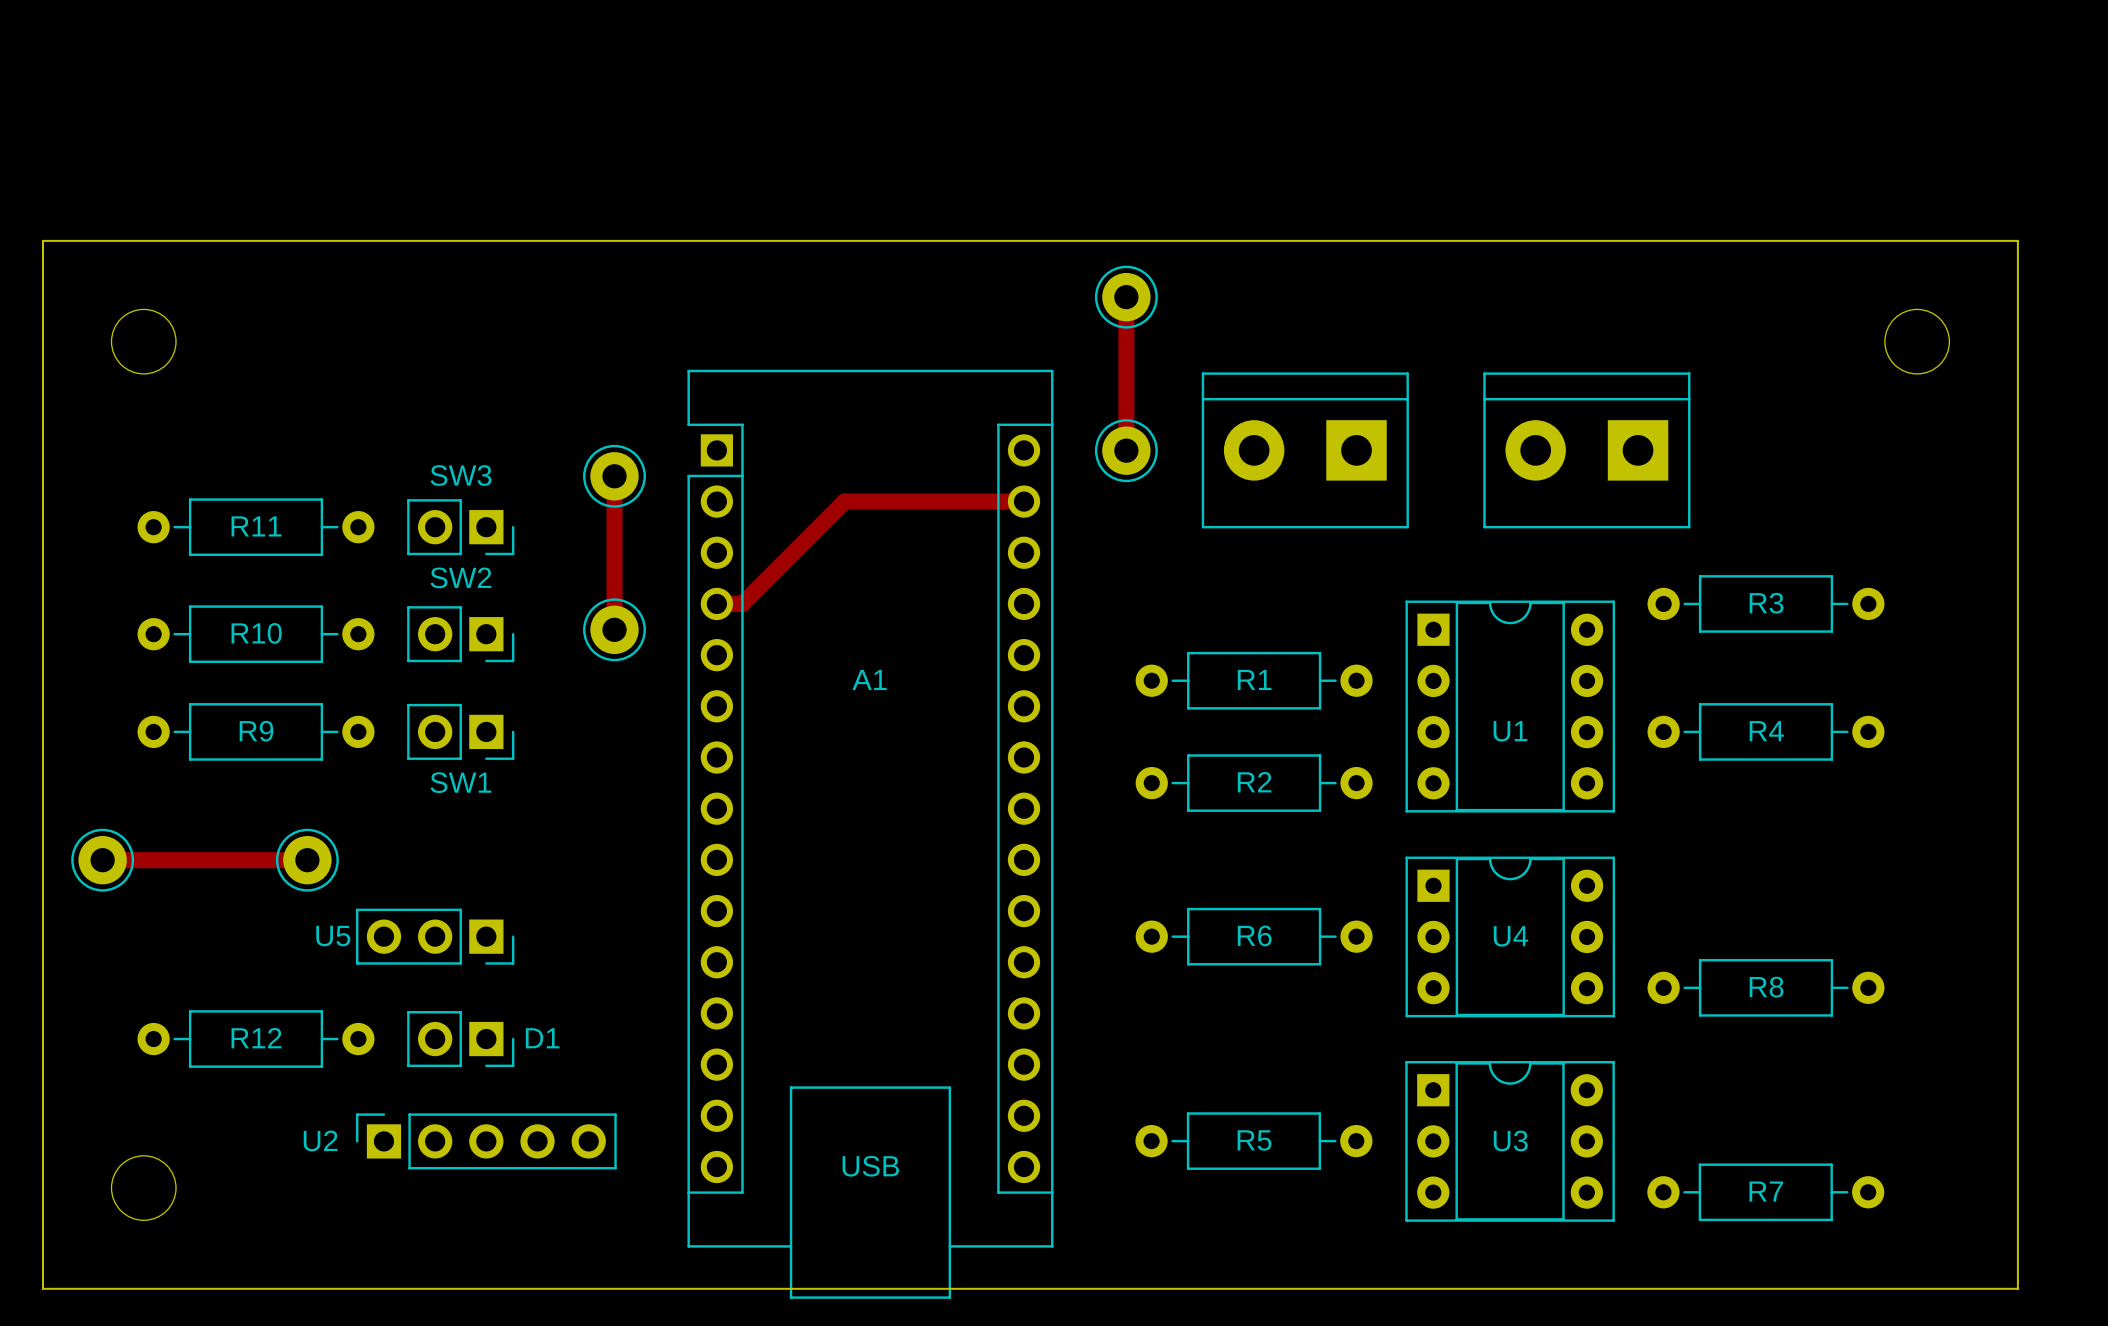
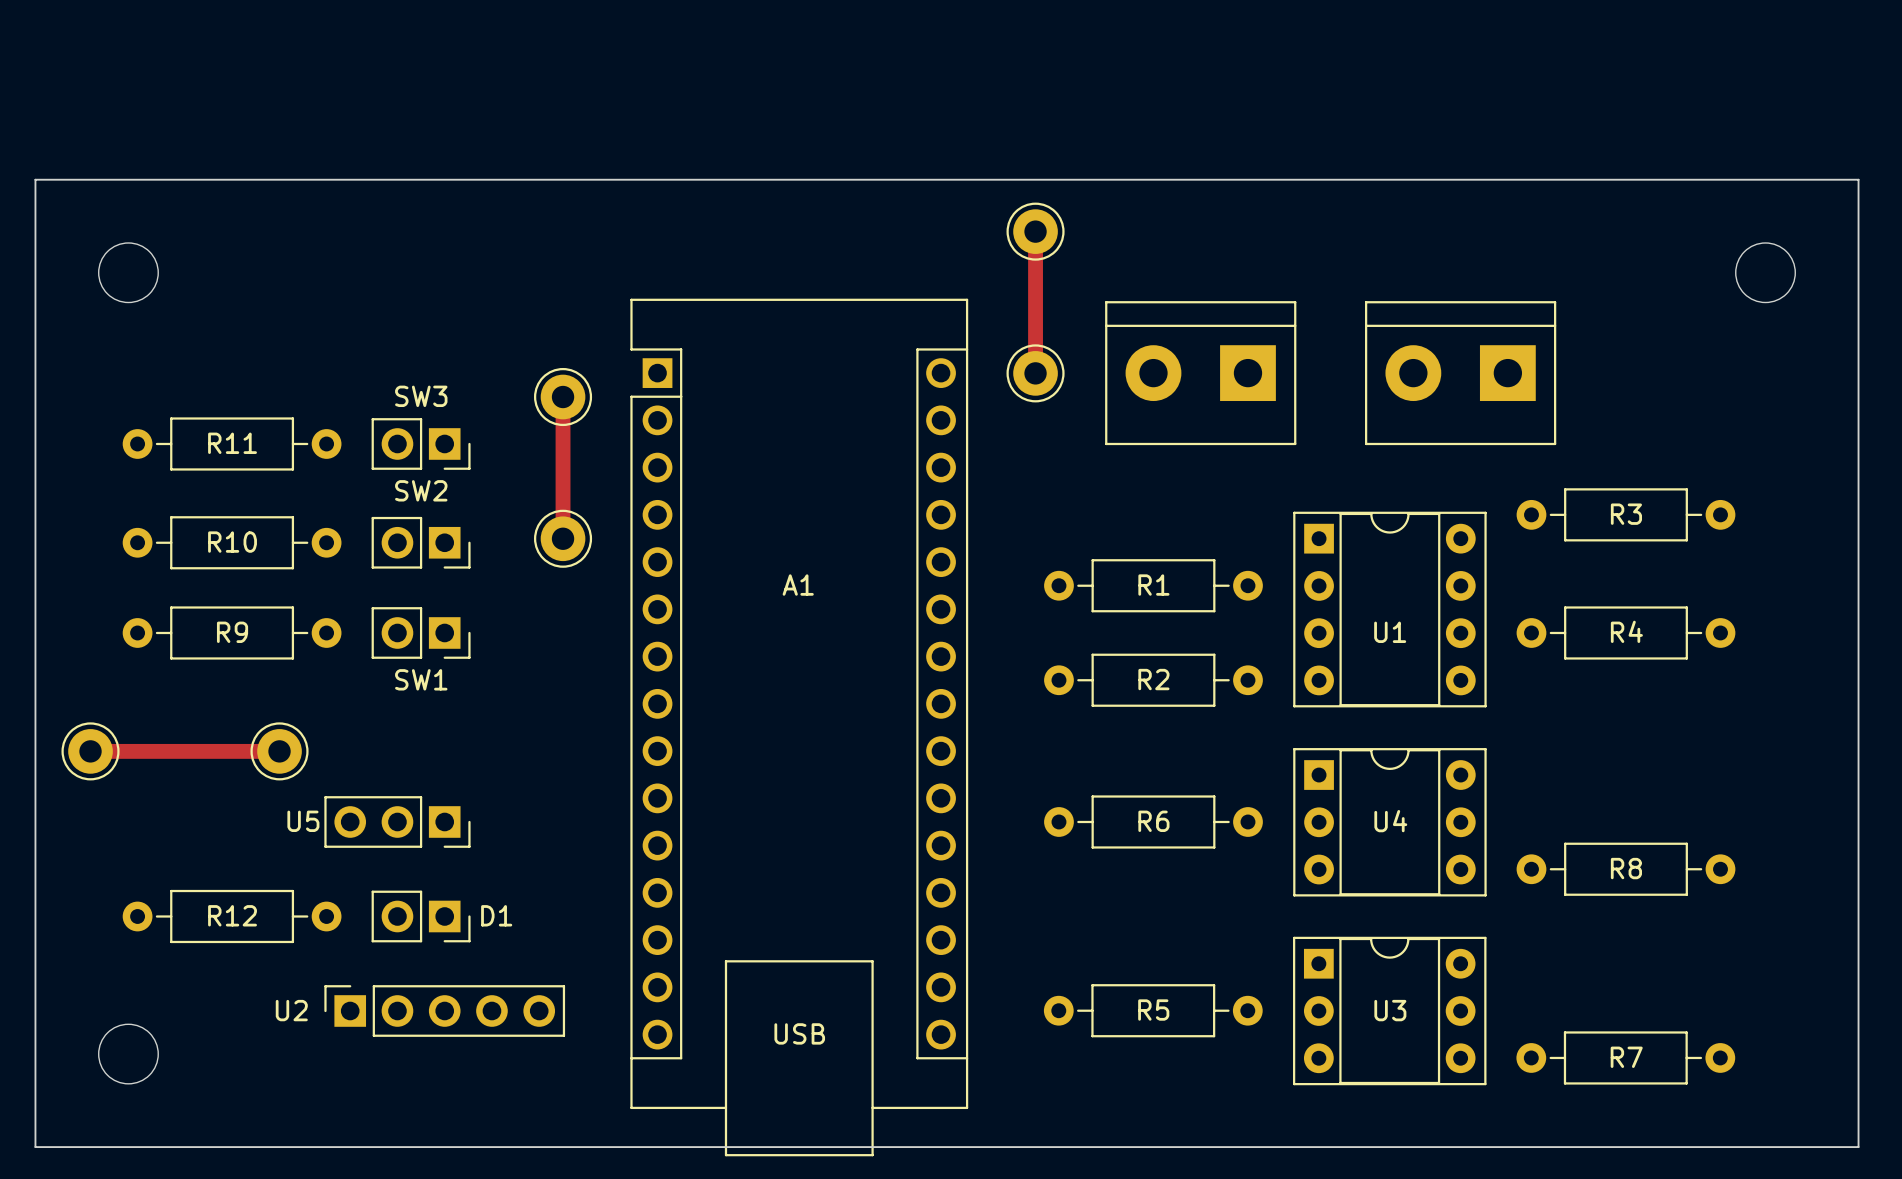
track: (1024, 501) (844, 501) (742, 603) (716, 603) -> none

